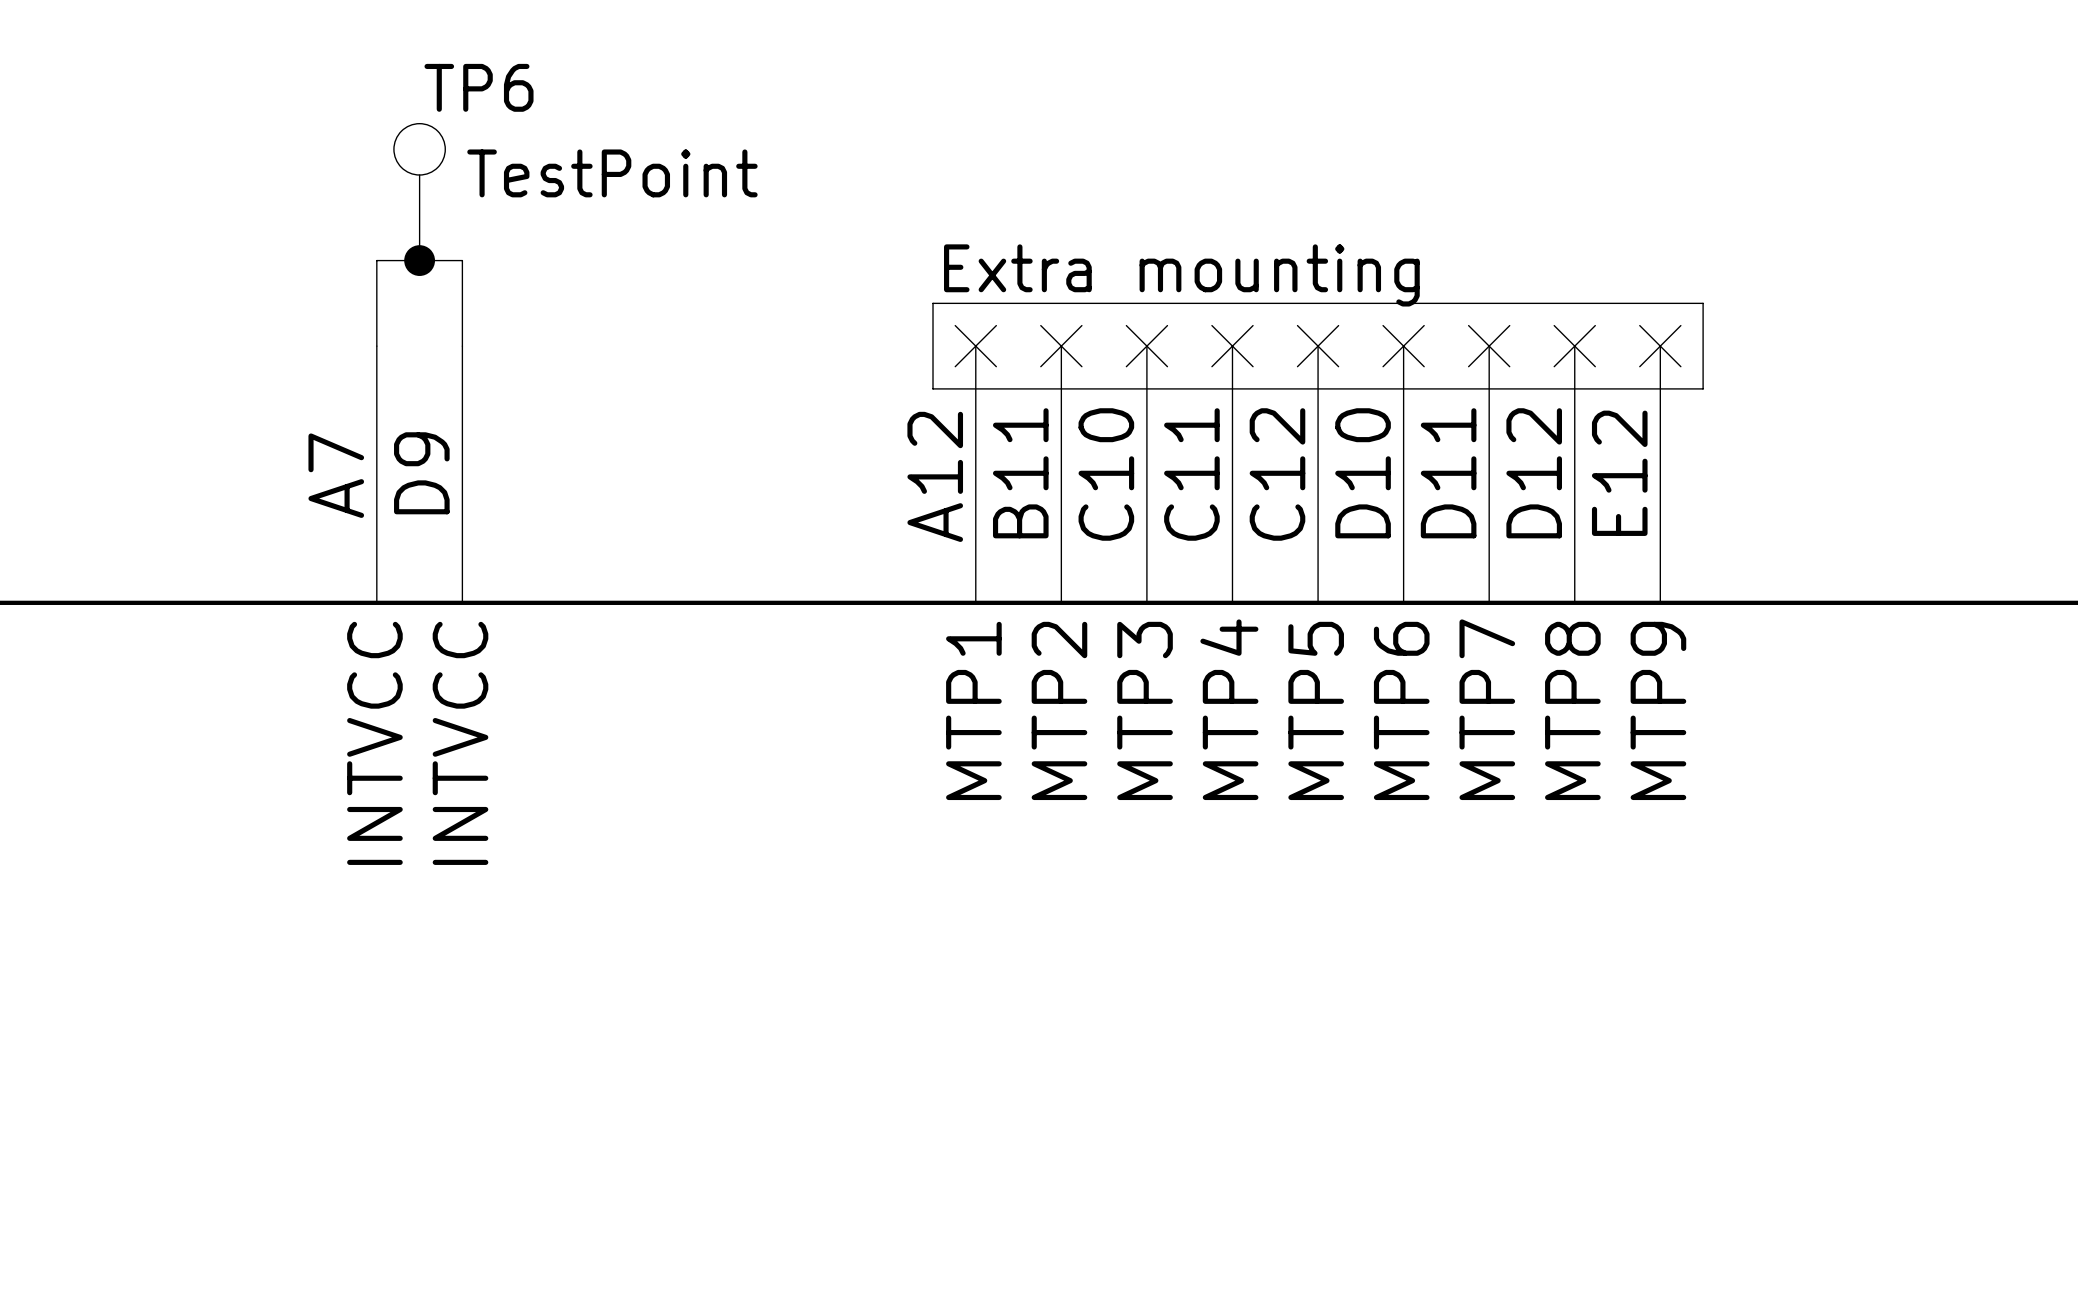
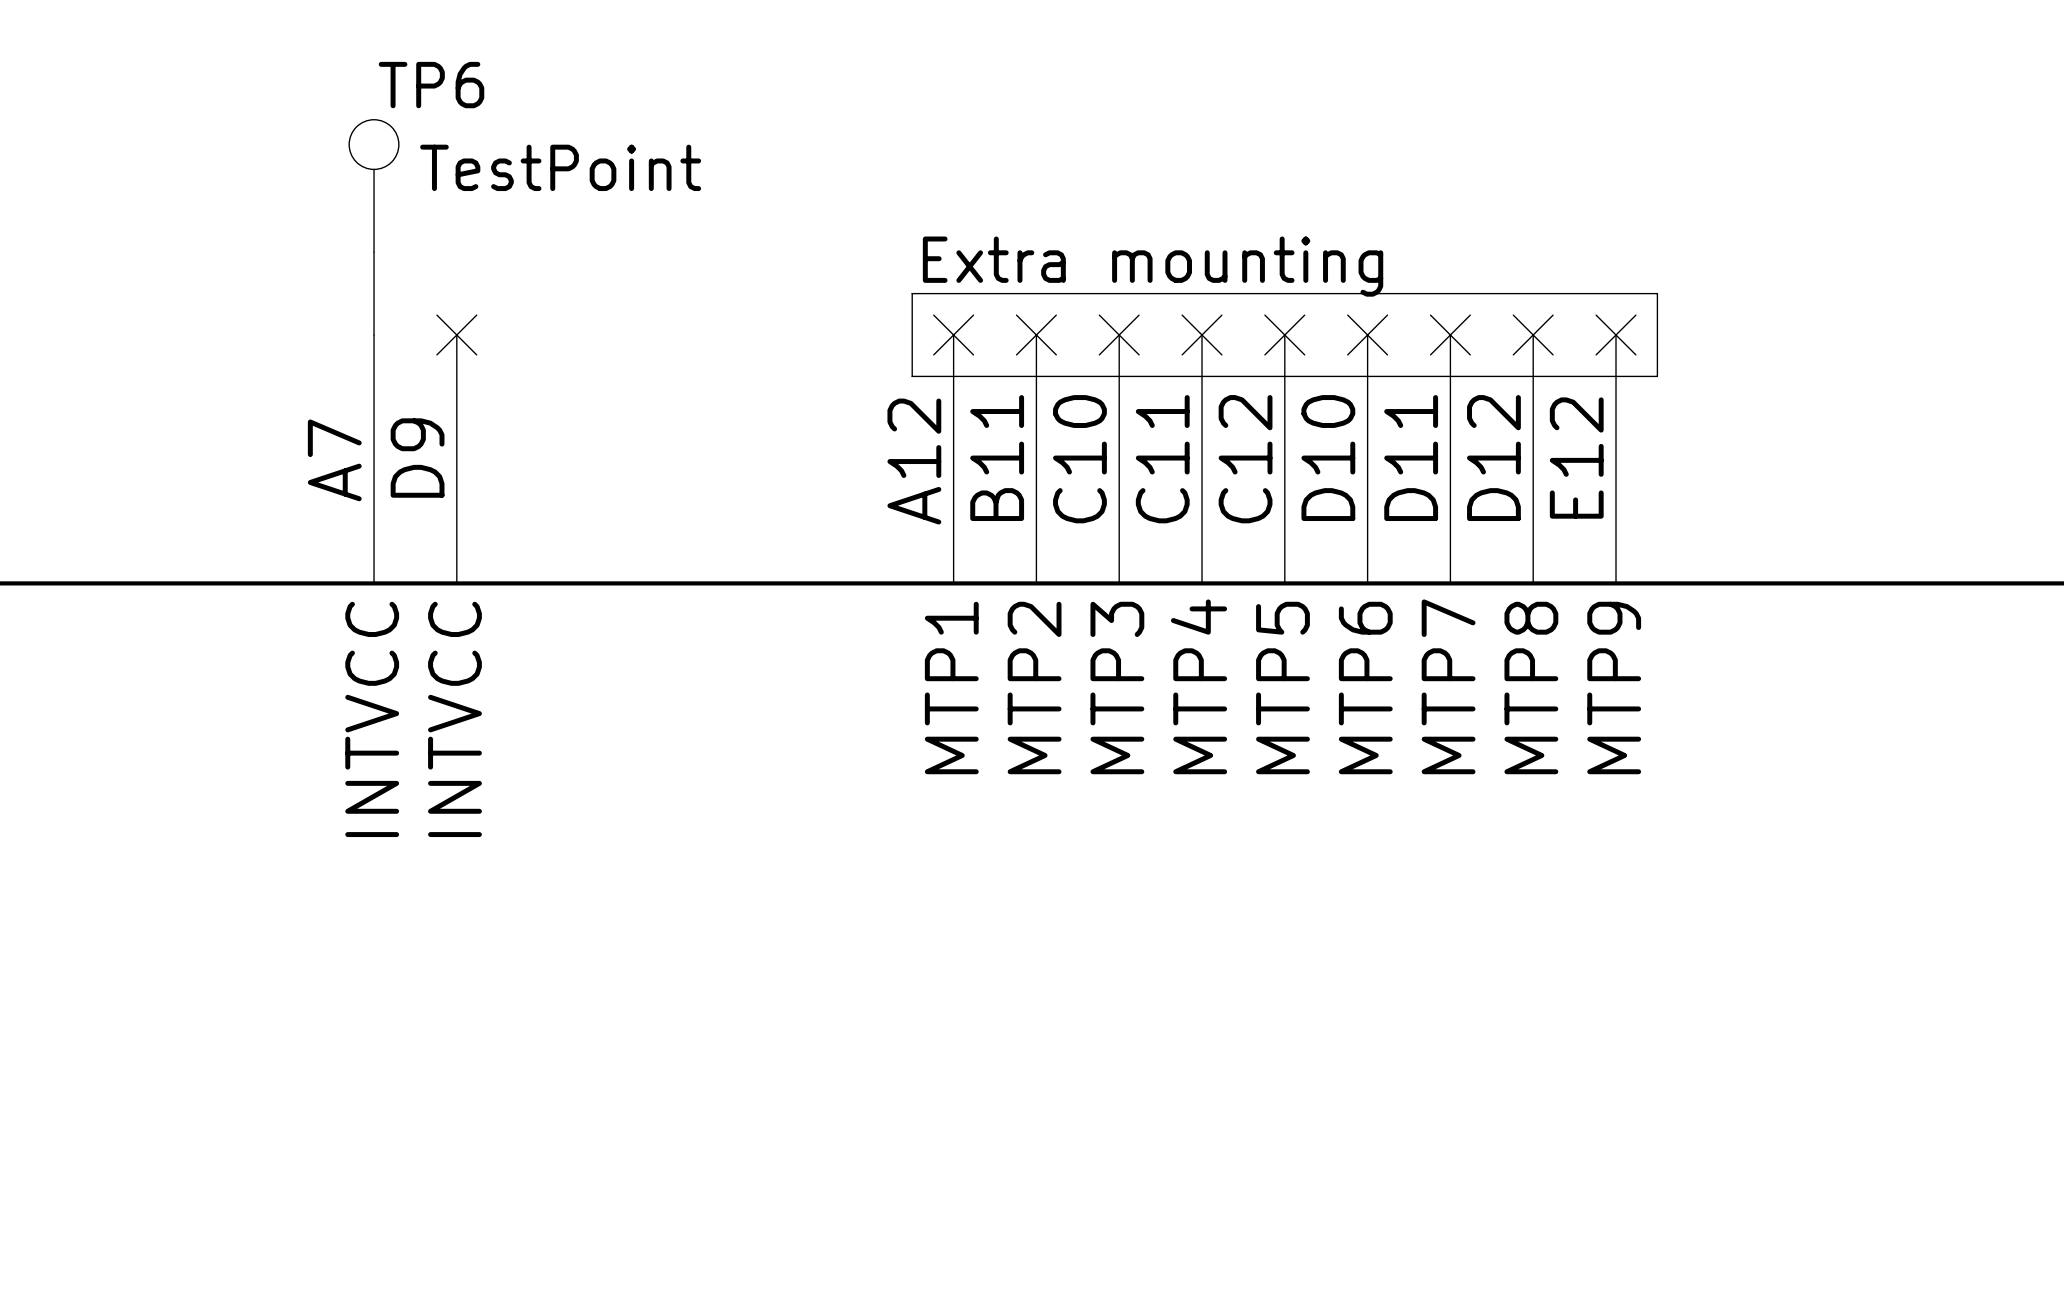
TP6 position: (419, 192) -> (374, 185)
wire: (376, 260) (462, 260) (462, 346) -> none
junction: (419, 260) -> none
no-connect mark: none -> (456, 335)

